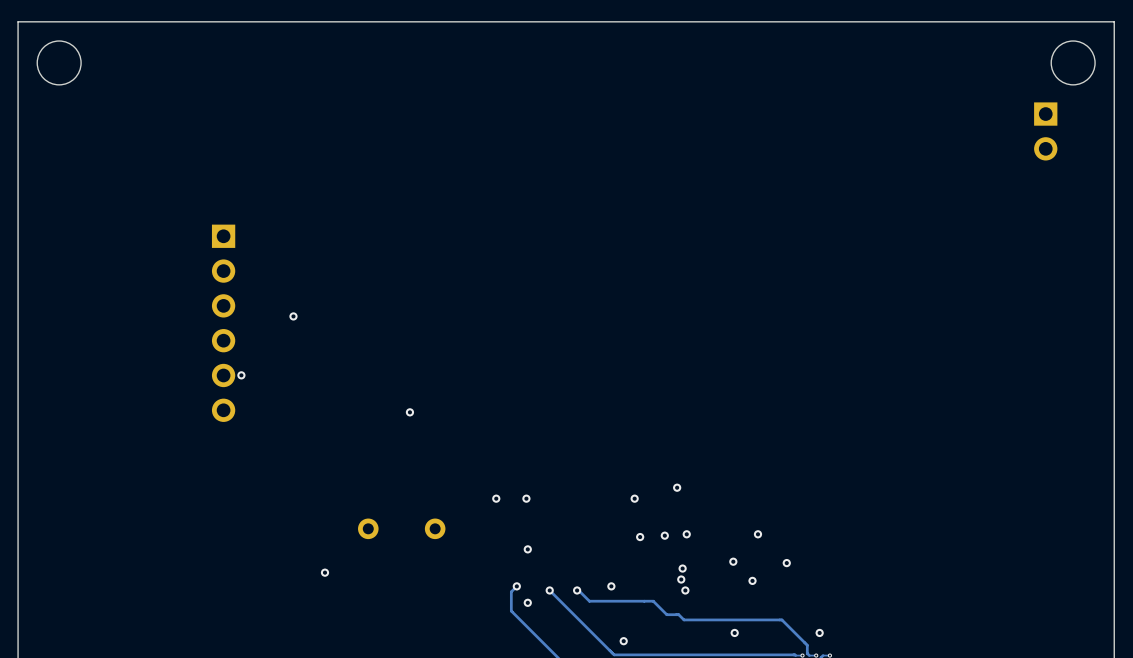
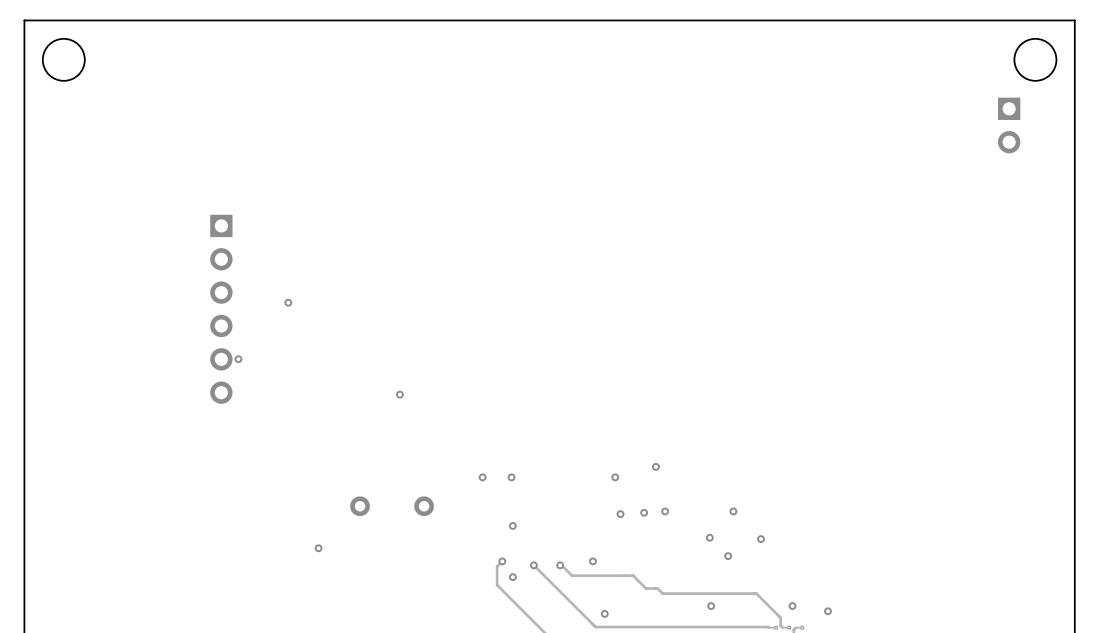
via: (682, 568) -> none
via: (681, 579) -> none
via: (685, 590) -> none
via: none -> (827, 611)

